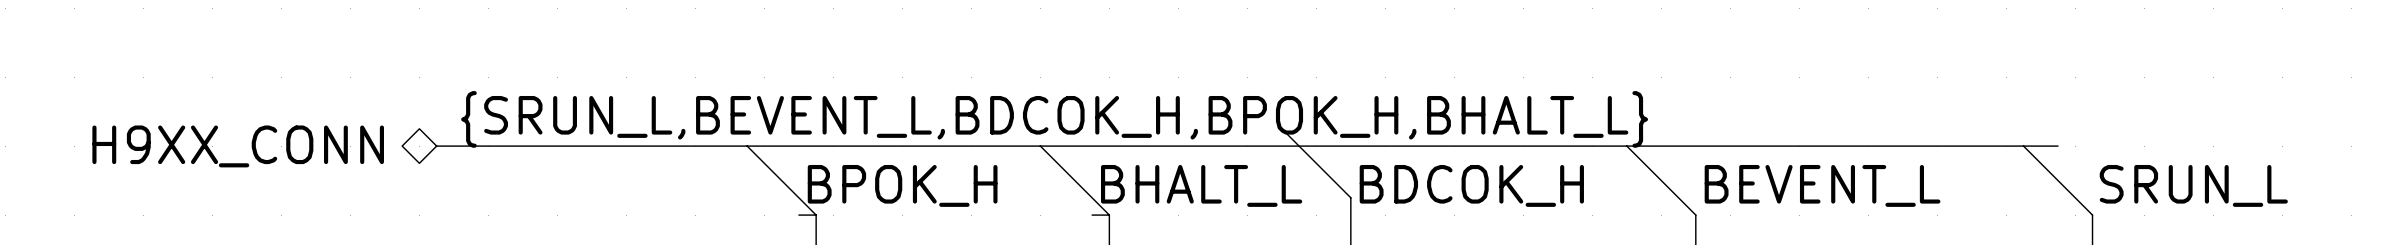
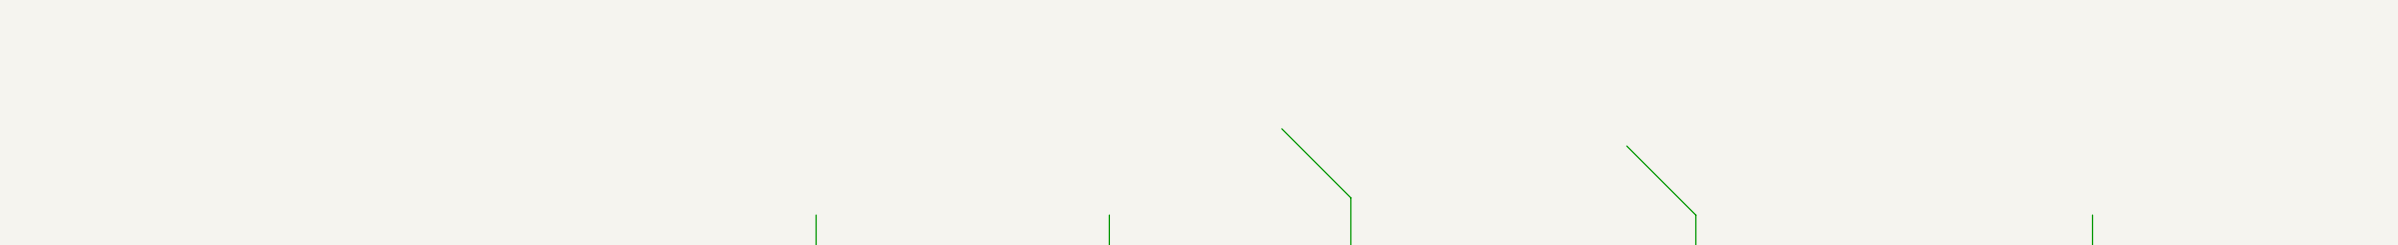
label: {SRUN_L,BEVENT_L,BDCOK_H,BPOK_H,BHALT_L} (1054, 119) -> none
hierarchical label: H9XX_CONN (238, 146) -> none
bus: (436, 146) (2058, 146) -> none
wire: (747, 146) (816, 215) (798, 215) -> none
wire: (1040, 146) (1109, 215) (1092, 215) -> none
wire: (2023, 146) (2092, 215) -> none
label: BPOK_H (902, 185) -> none
label: BHALT_L (1201, 185) -> none
label: BDCOK_H (1471, 185) -> none
label: BEVENT_L (1822, 185) -> none
label: SRUN_L (2193, 185) -> none

